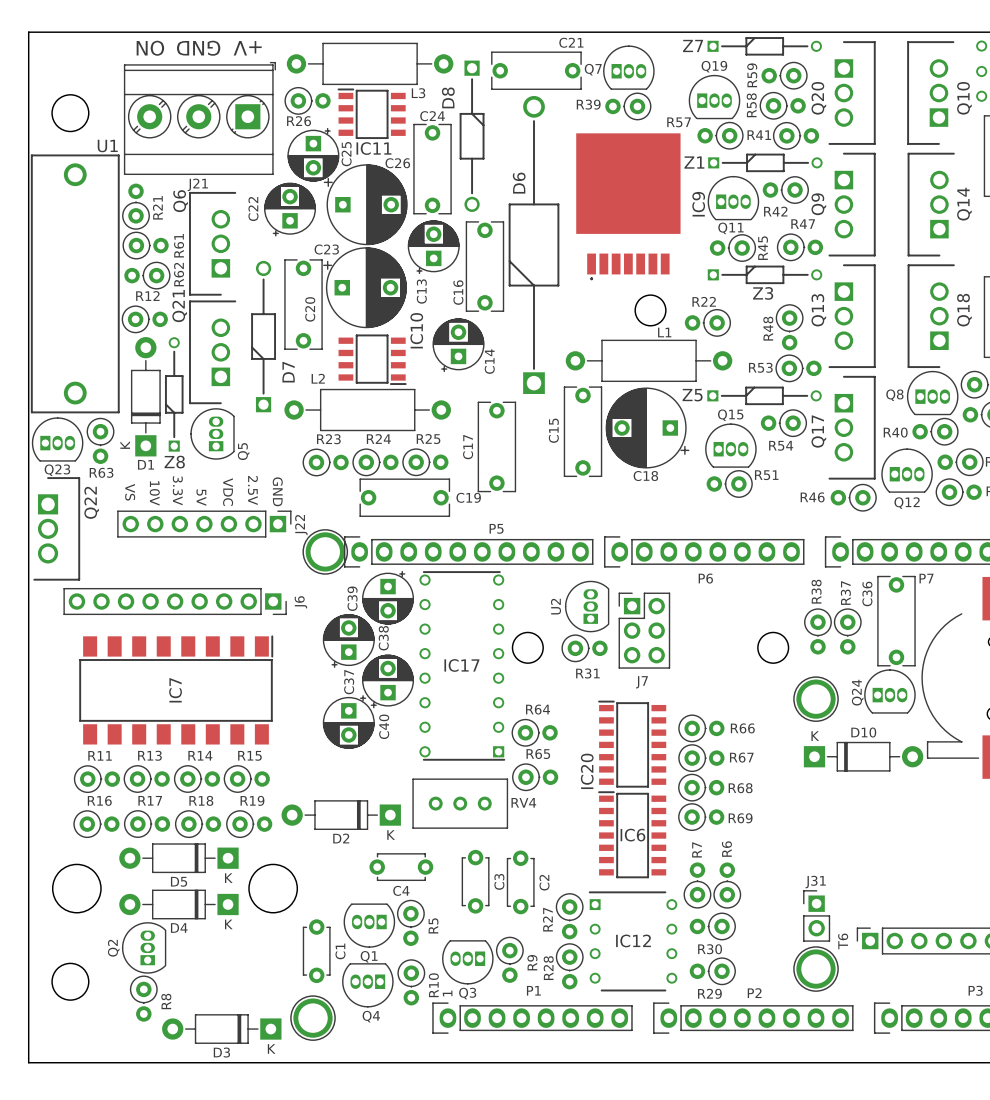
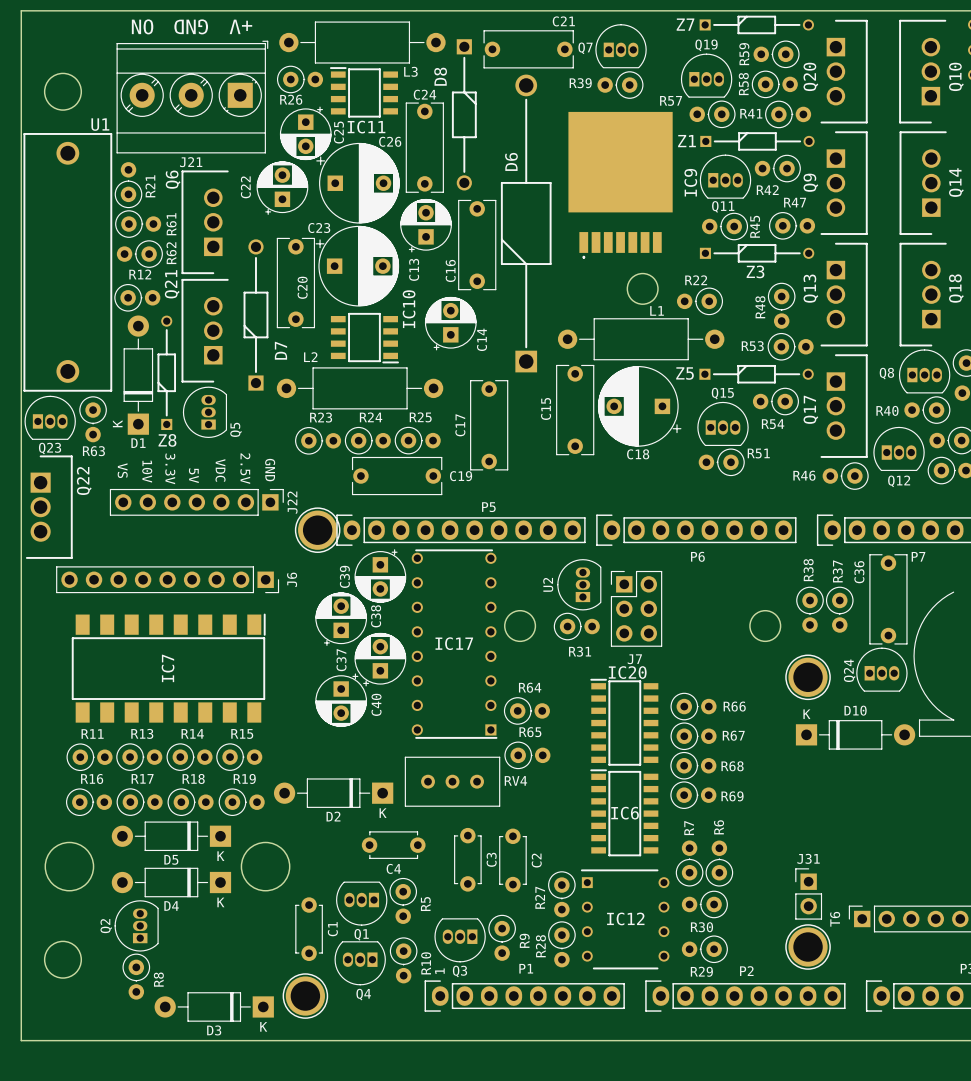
IC20 name rotation: 0° (587, 771) -> 90° clockwise (627, 672)
IC20 name position: IC20 (587, 771) -> IC20 (627, 672)

